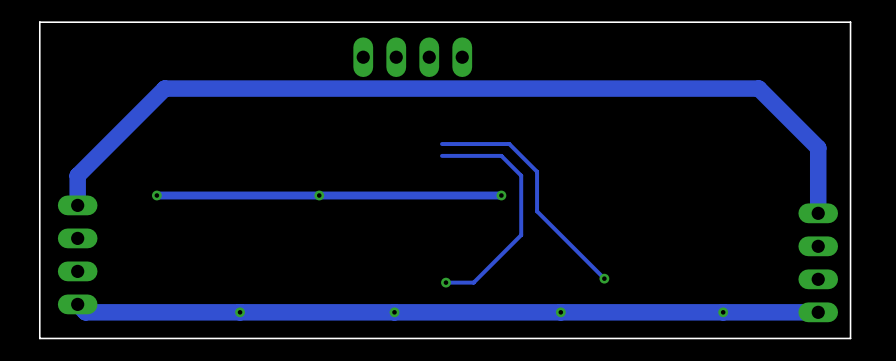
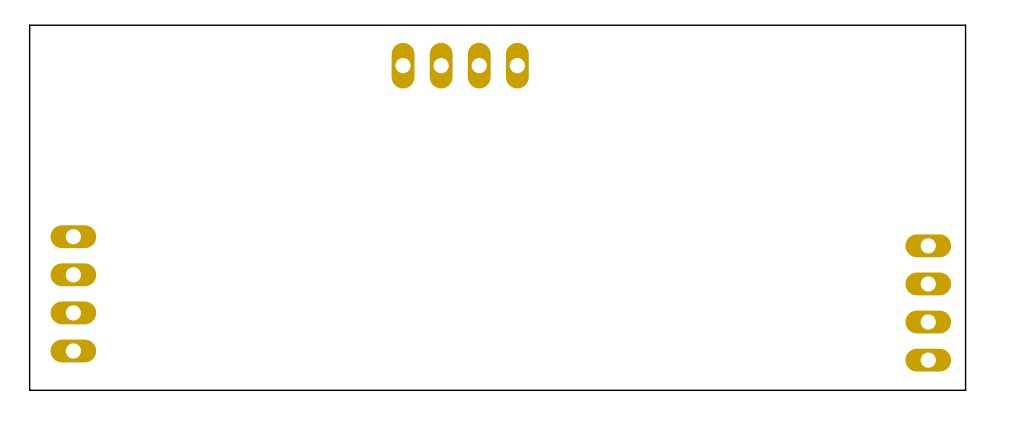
track: (442, 144) (509, 144) (537, 171) (537, 211) (604, 278) -> none
track: (442, 155) (501, 155) (521, 175) (521, 235) (473, 282) (445, 282) -> none
via: (156, 195) -> none
via: (319, 195) -> none
track: (501, 195) (156, 195) -> none
via: (501, 195) -> none
track: (77, 205) (77, 175) (164, 88) (758, 88) (818, 147) (818, 213) -> none
via: (604, 278) -> none
via: (445, 282) -> none
track: (77, 304) (85, 312) (818, 312) -> none
via: (240, 312) -> none
via: (394, 312) -> none
via: (560, 312) -> none
via: (723, 312) -> none

